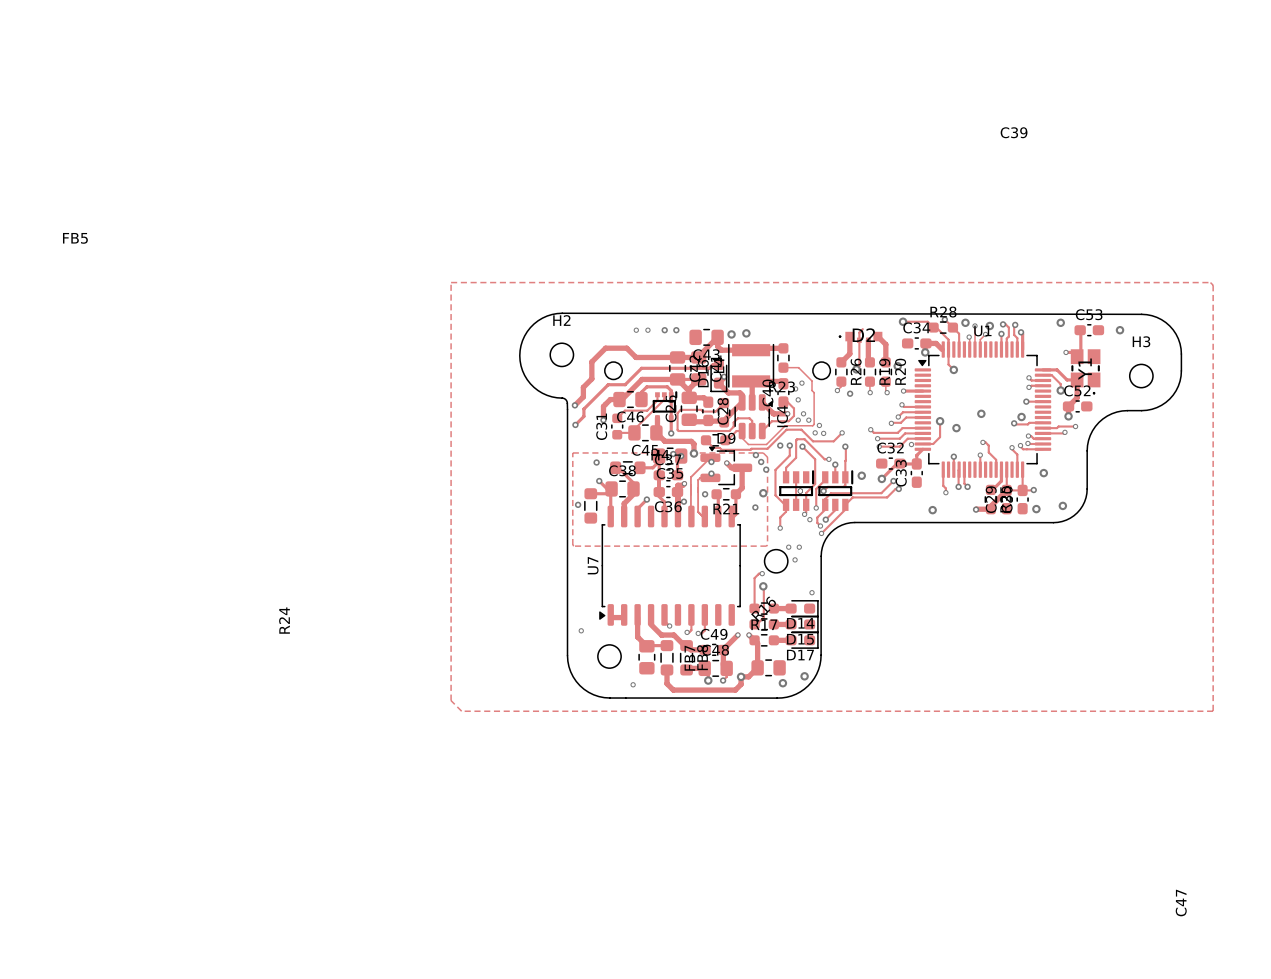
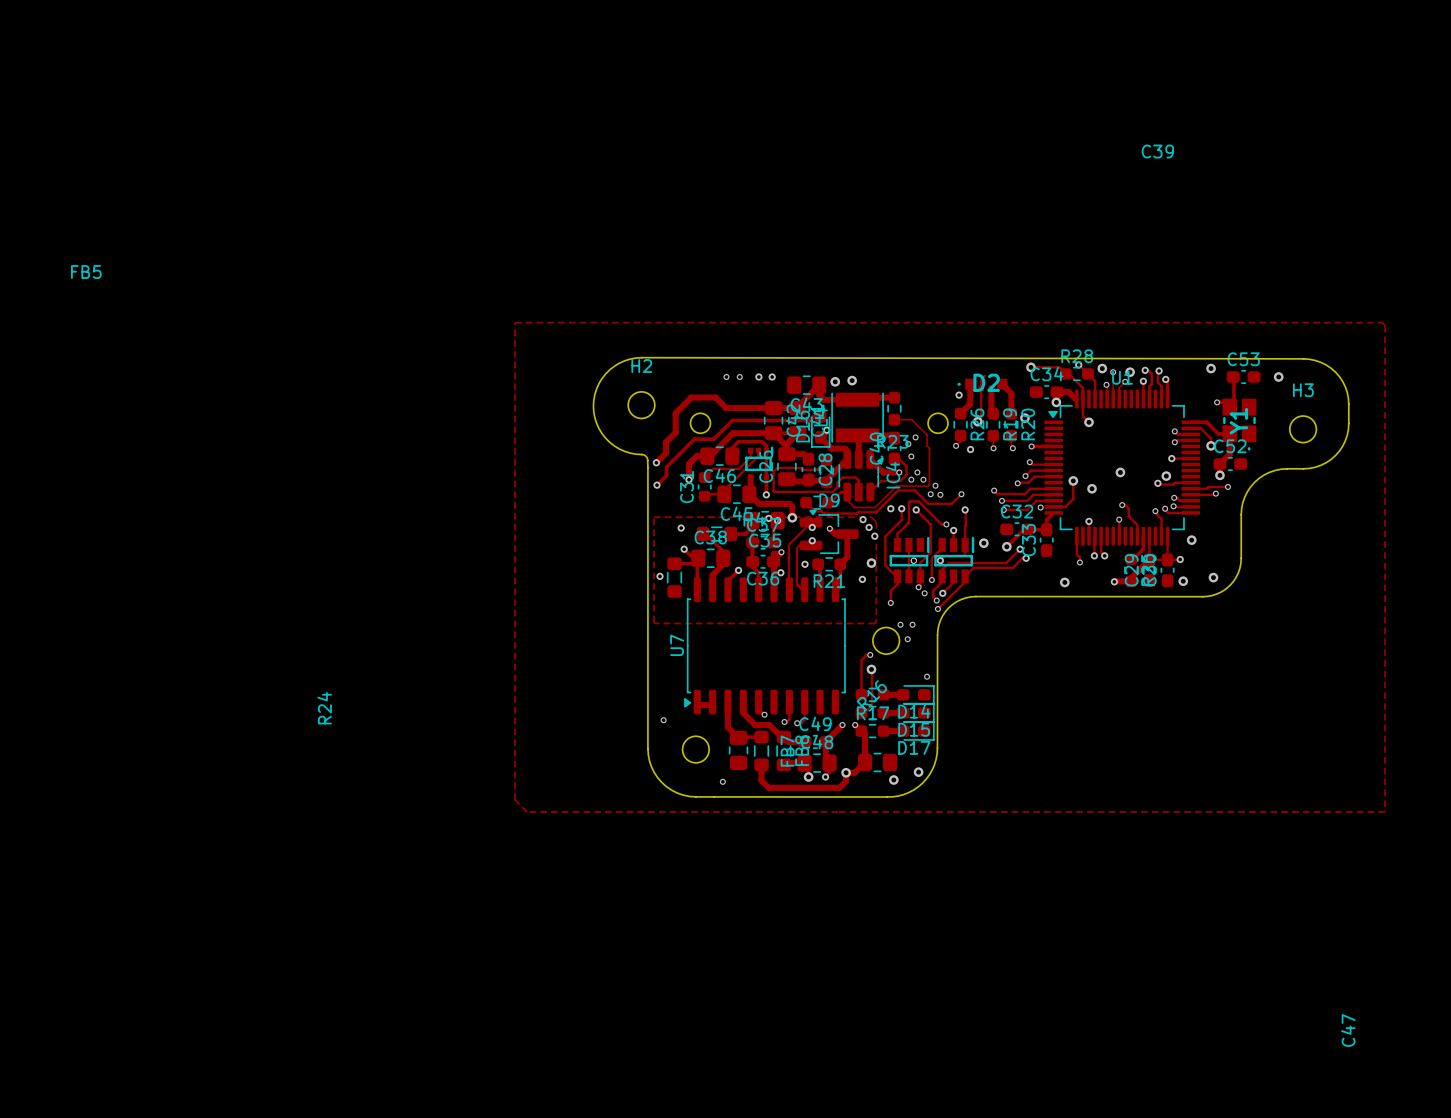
via: none -> (959, 395)

